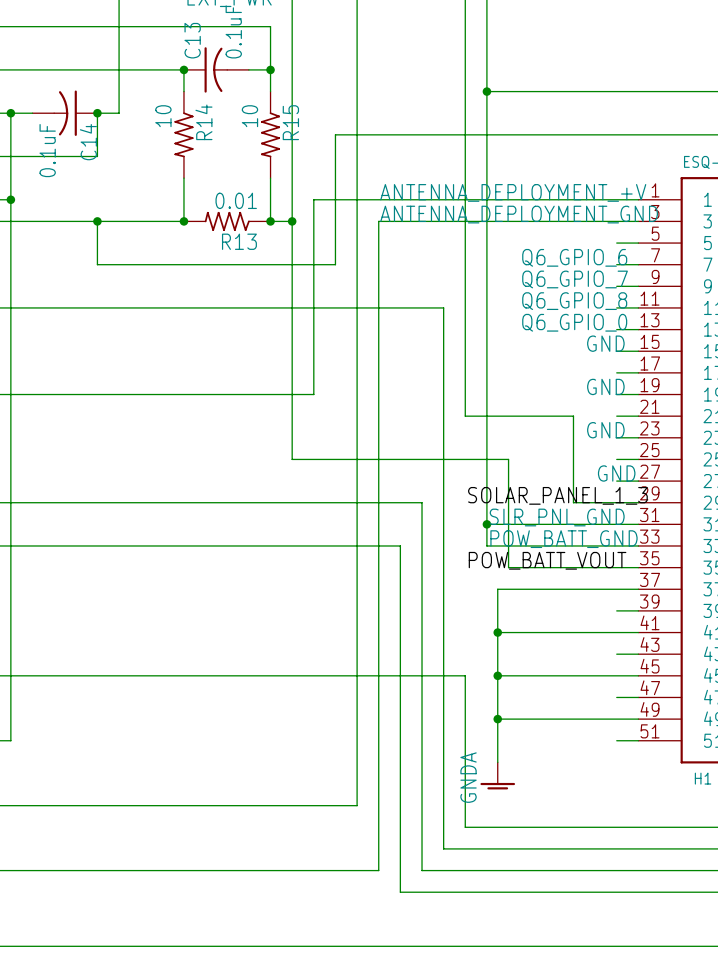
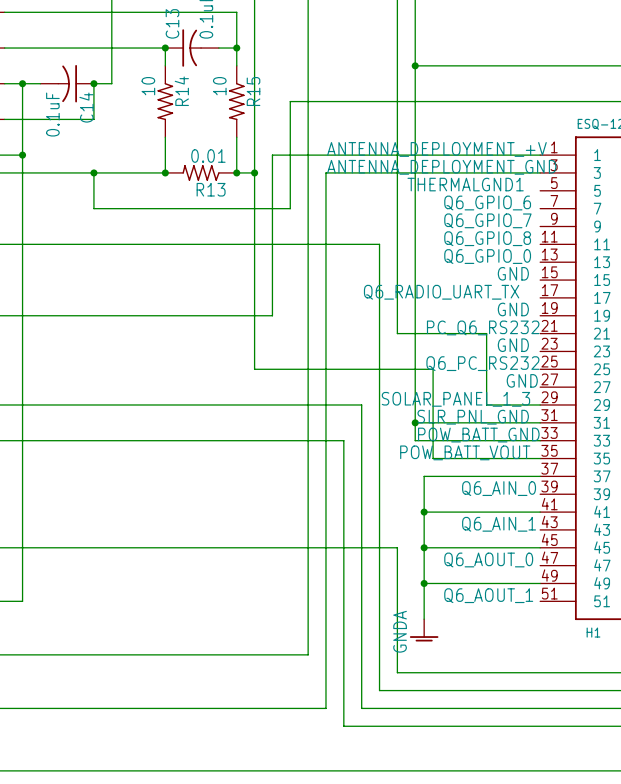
text: none -> THERMALGND1 (465, 184)
wire: (616, 243) (638, 243) -> none
wire: (616, 264) (638, 264) -> none
wire: (616, 286) (638, 286) -> none
wire: (616, 307) (638, 307) -> none
wire: (616, 329) (638, 329) -> none
wire: (616, 351) (638, 351) -> none
text: none -> Q6_RADIO_UART_TX (441, 292)
wire: (616, 372) (638, 372) -> none
wire: (616, 394) (638, 394) -> none
text: none -> PC_Q6_RS232 (483, 327)
wire: (616, 437) (638, 437) -> none
text: none -> Q6_PC_RS232 (482, 363)
wire: (616, 481) (638, 481) -> none
text: none -> SOLAR_PANEL_1_3 (455, 399)
label: SOLAR_PANEL_1_3 (557, 495) -> none
label: POW_BATT_VOUT (547, 560) -> none
text: none -> POW_BATT_VOUT (465, 452)
text: none -> Q6_AIN_0 (499, 488)
wire: (616, 610) (638, 610) -> none
text: none -> Q6_AIN_1 (499, 524)
wire: (616, 654) (638, 654) -> none
text: none -> Q6_AOUT_0 (488, 559)
wire: (616, 697) (638, 697) -> none
text: none -> Q6_AOUT_1 (488, 595)
wire: (616, 740) (638, 740) -> none

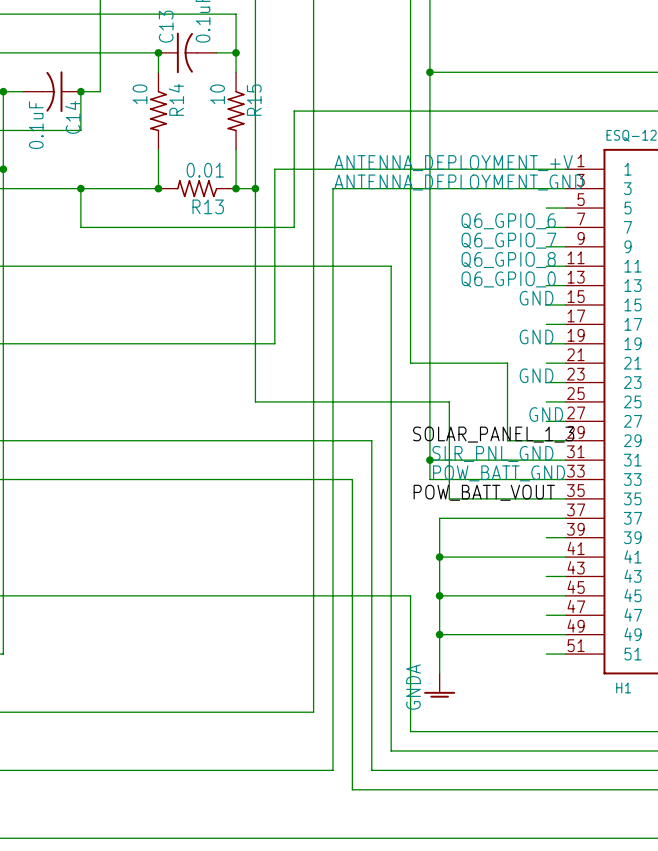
text: THERMALGND1 (465, 184) -> none
wire: none -> (546, 208) (565, 208)
wire: none -> (546, 227) (565, 227)
wire: none -> (546, 246) (565, 246)
wire: none -> (546, 266) (565, 266)
wire: none -> (546, 285) (565, 285)
wire: none -> (546, 304) (565, 304)
text: Q6_RADIO_UART_TX (441, 292) -> none
wire: none -> (546, 324) (565, 324)
wire: none -> (546, 343) (565, 343)
text: PC_Q6_RS232 (483, 327) -> none
wire: none -> (546, 382) (565, 382)
text: Q6_PC_RS232 (482, 363) -> none
wire: none -> (546, 421) (565, 421)
text: SOLAR_PANEL_1_3 (455, 399) -> none
label: none -> SOLAR_PANEL_1_3 (493, 434)
text: POW_BATT_VOUT (465, 452) -> none
label: none -> POW_BATT_VOUT (484, 492)
text: Q6_AIN_0 (499, 488) -> none
wire: none -> (546, 537) (565, 537)
text: Q6_AIN_1 (499, 524) -> none
wire: none -> (546, 576) (565, 576)
text: Q6_AOUT_0 (488, 559) -> none
wire: none -> (546, 615) (565, 615)
text: Q6_AOUT_1 (488, 595) -> none
wire: none -> (546, 654) (565, 654)

